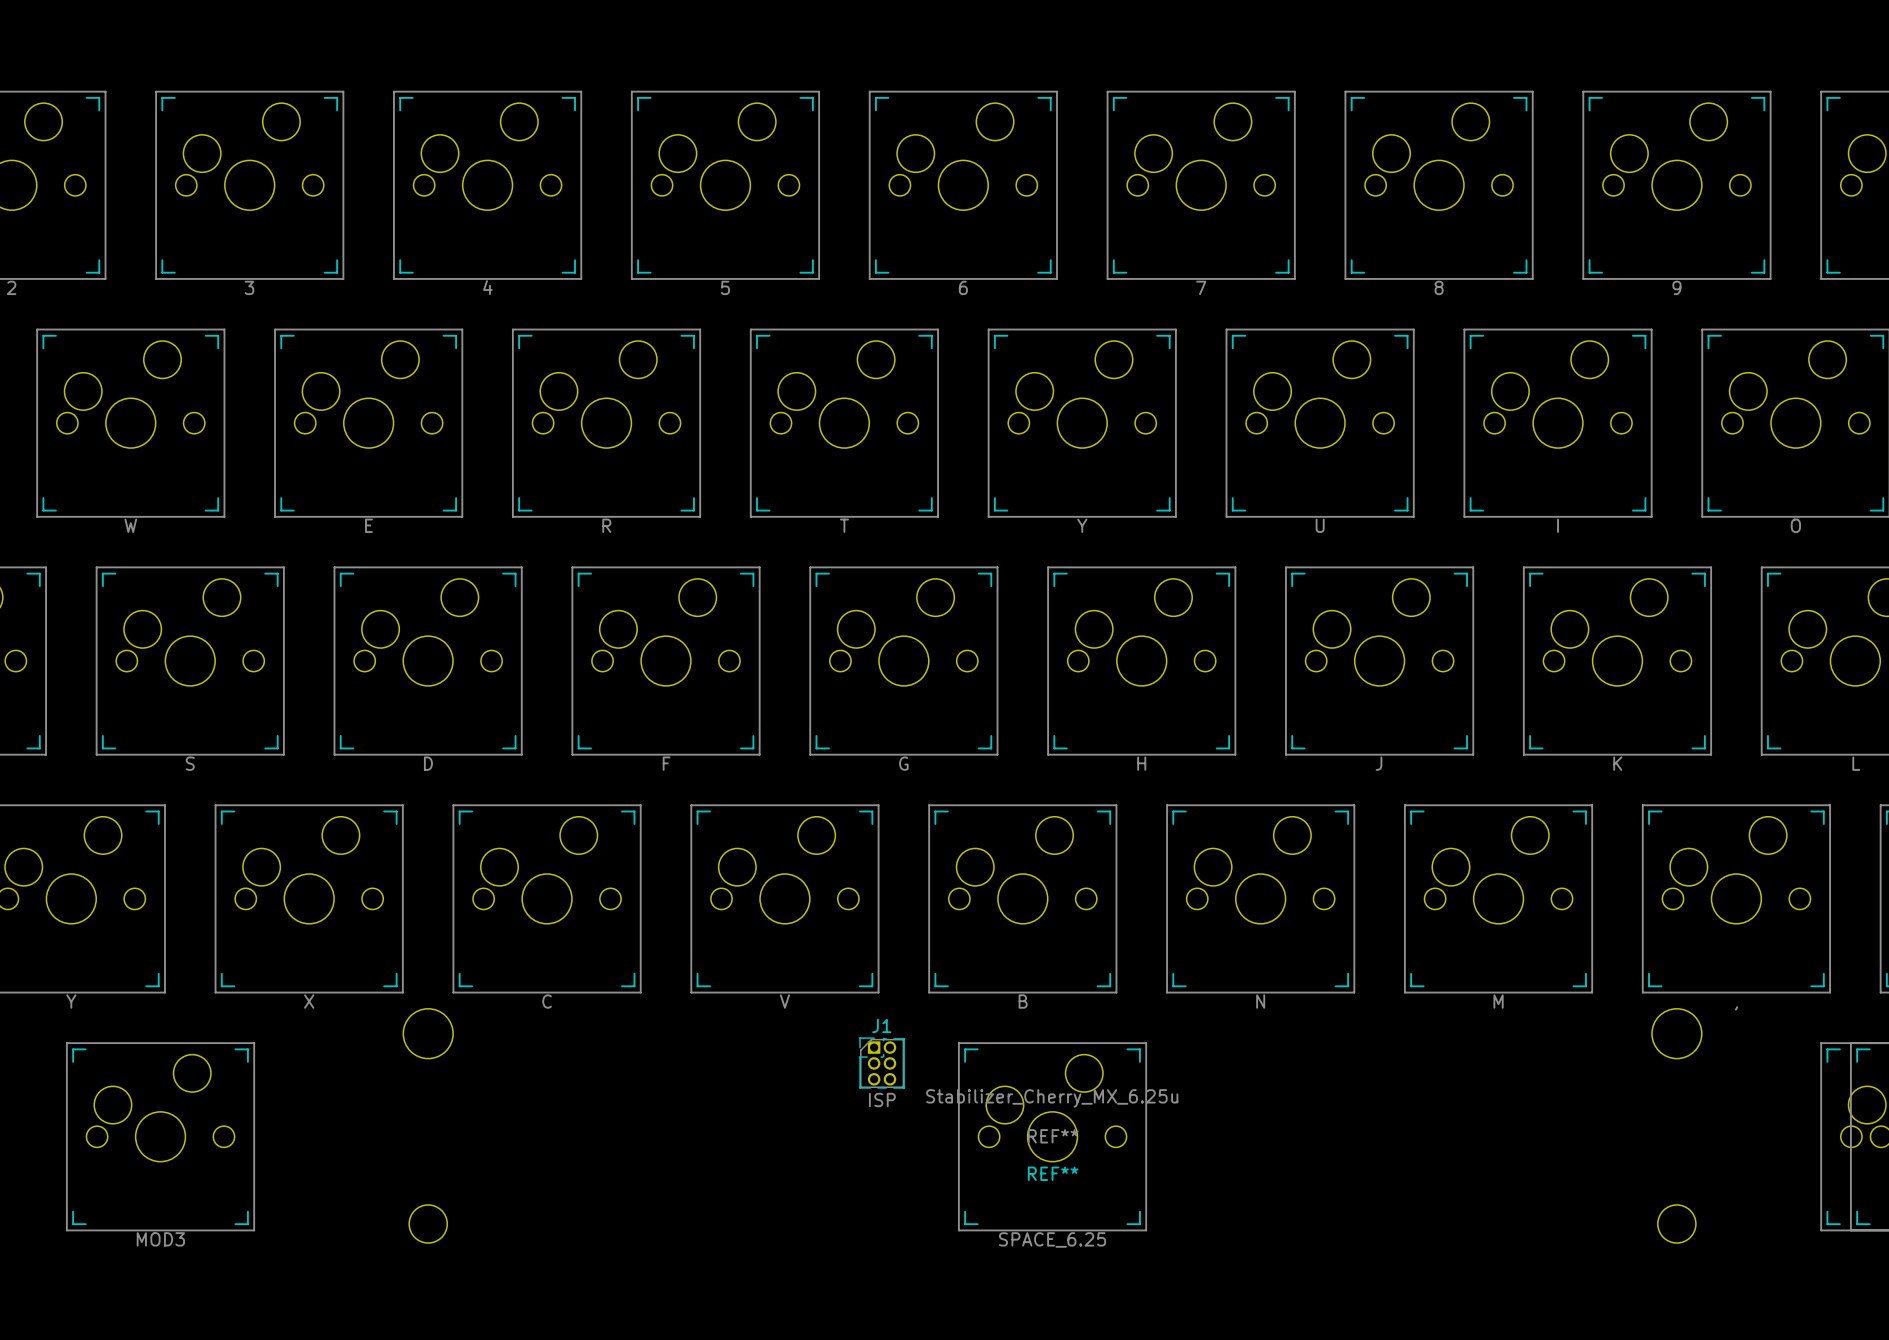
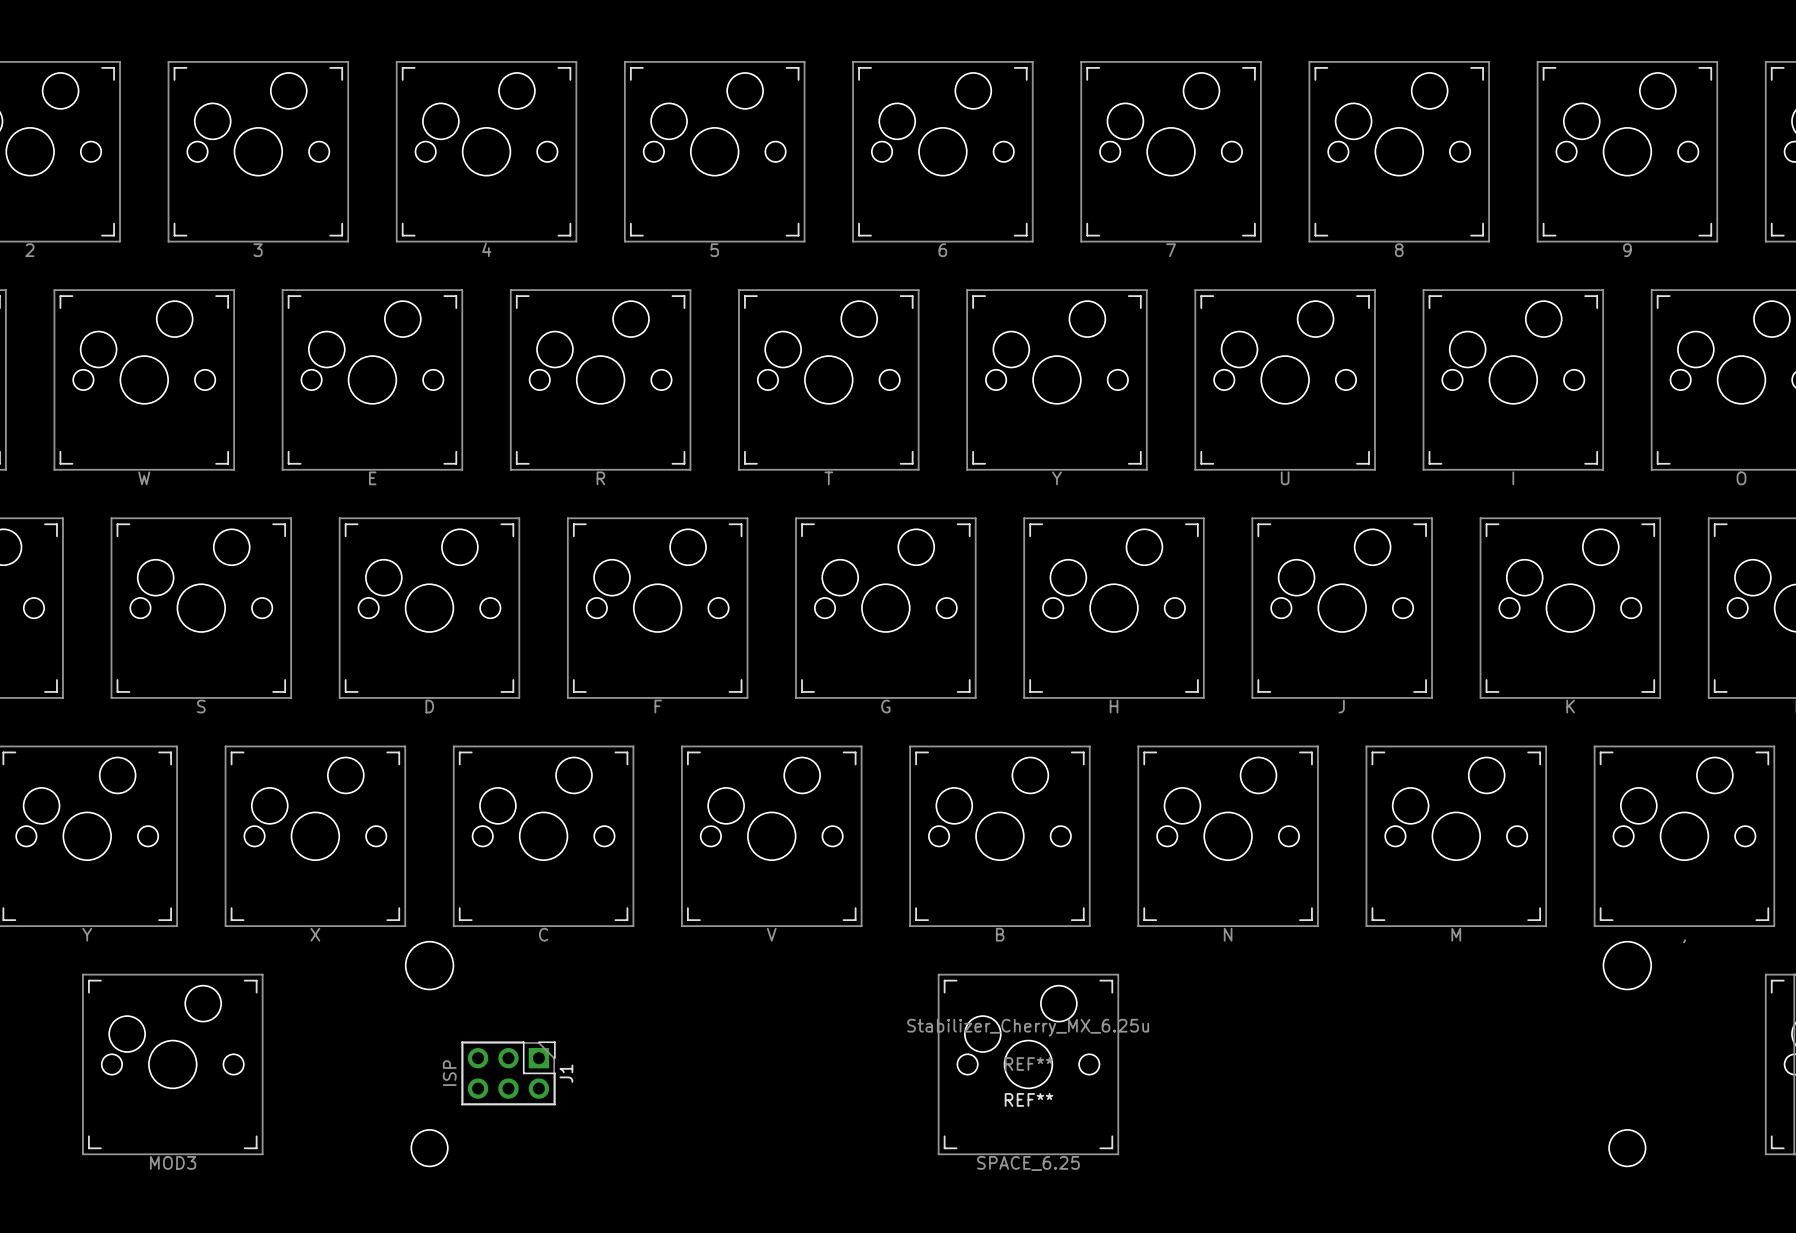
J1 name position: J1 (881, 1025) -> J1 (566, 1073)
J1 footprint: [859, 1037, 905, 1089] -> [461, 1041, 556, 1106]
J1 value position: ISP (882, 1099) -> ISP (449, 1073)

